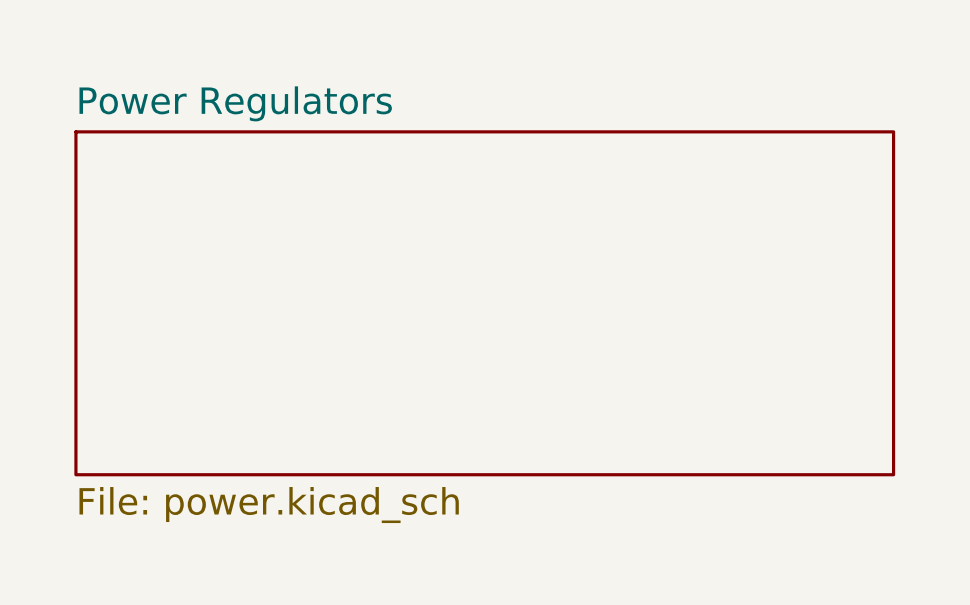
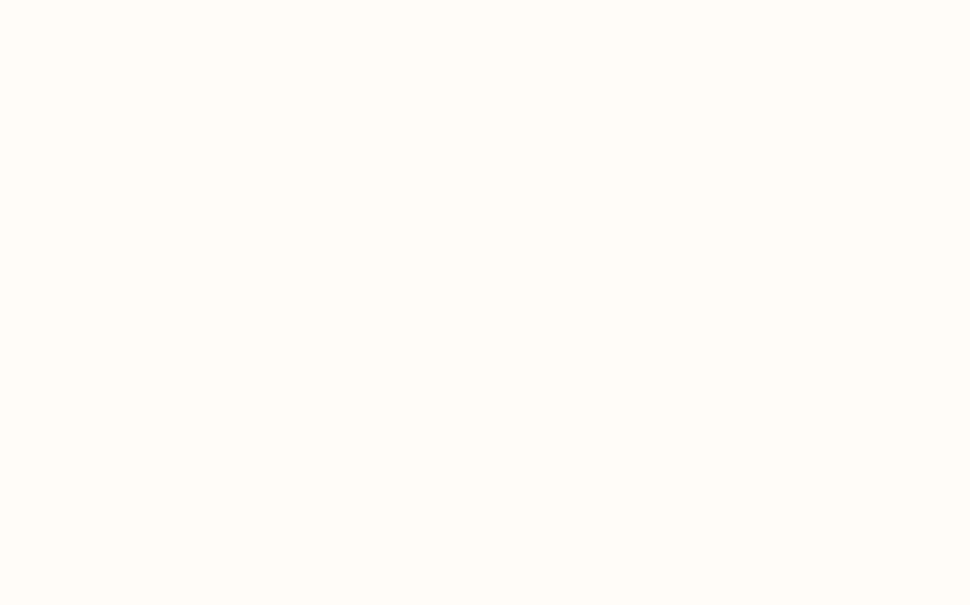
sheet Power Regulators: File: power.kicad_sch (484, 303) -> none

